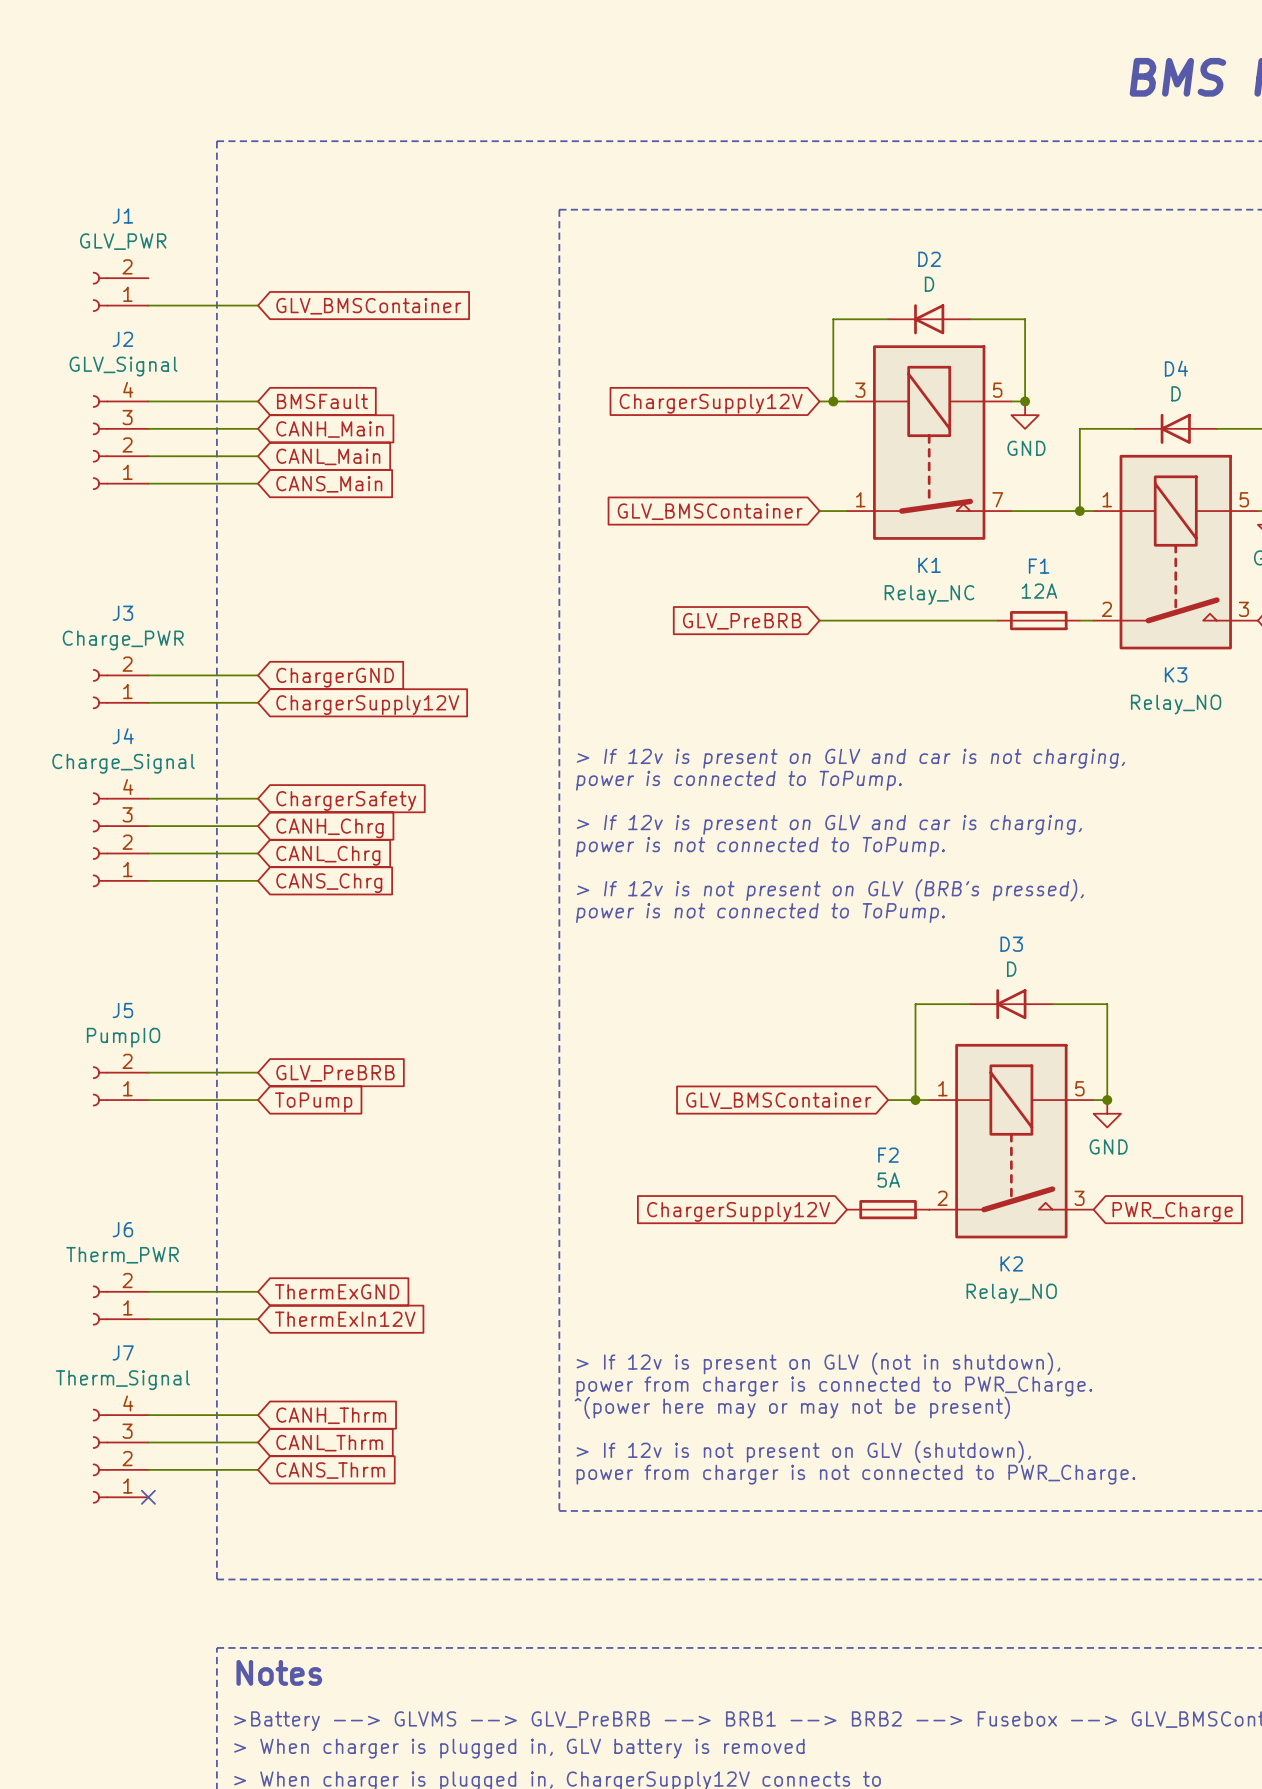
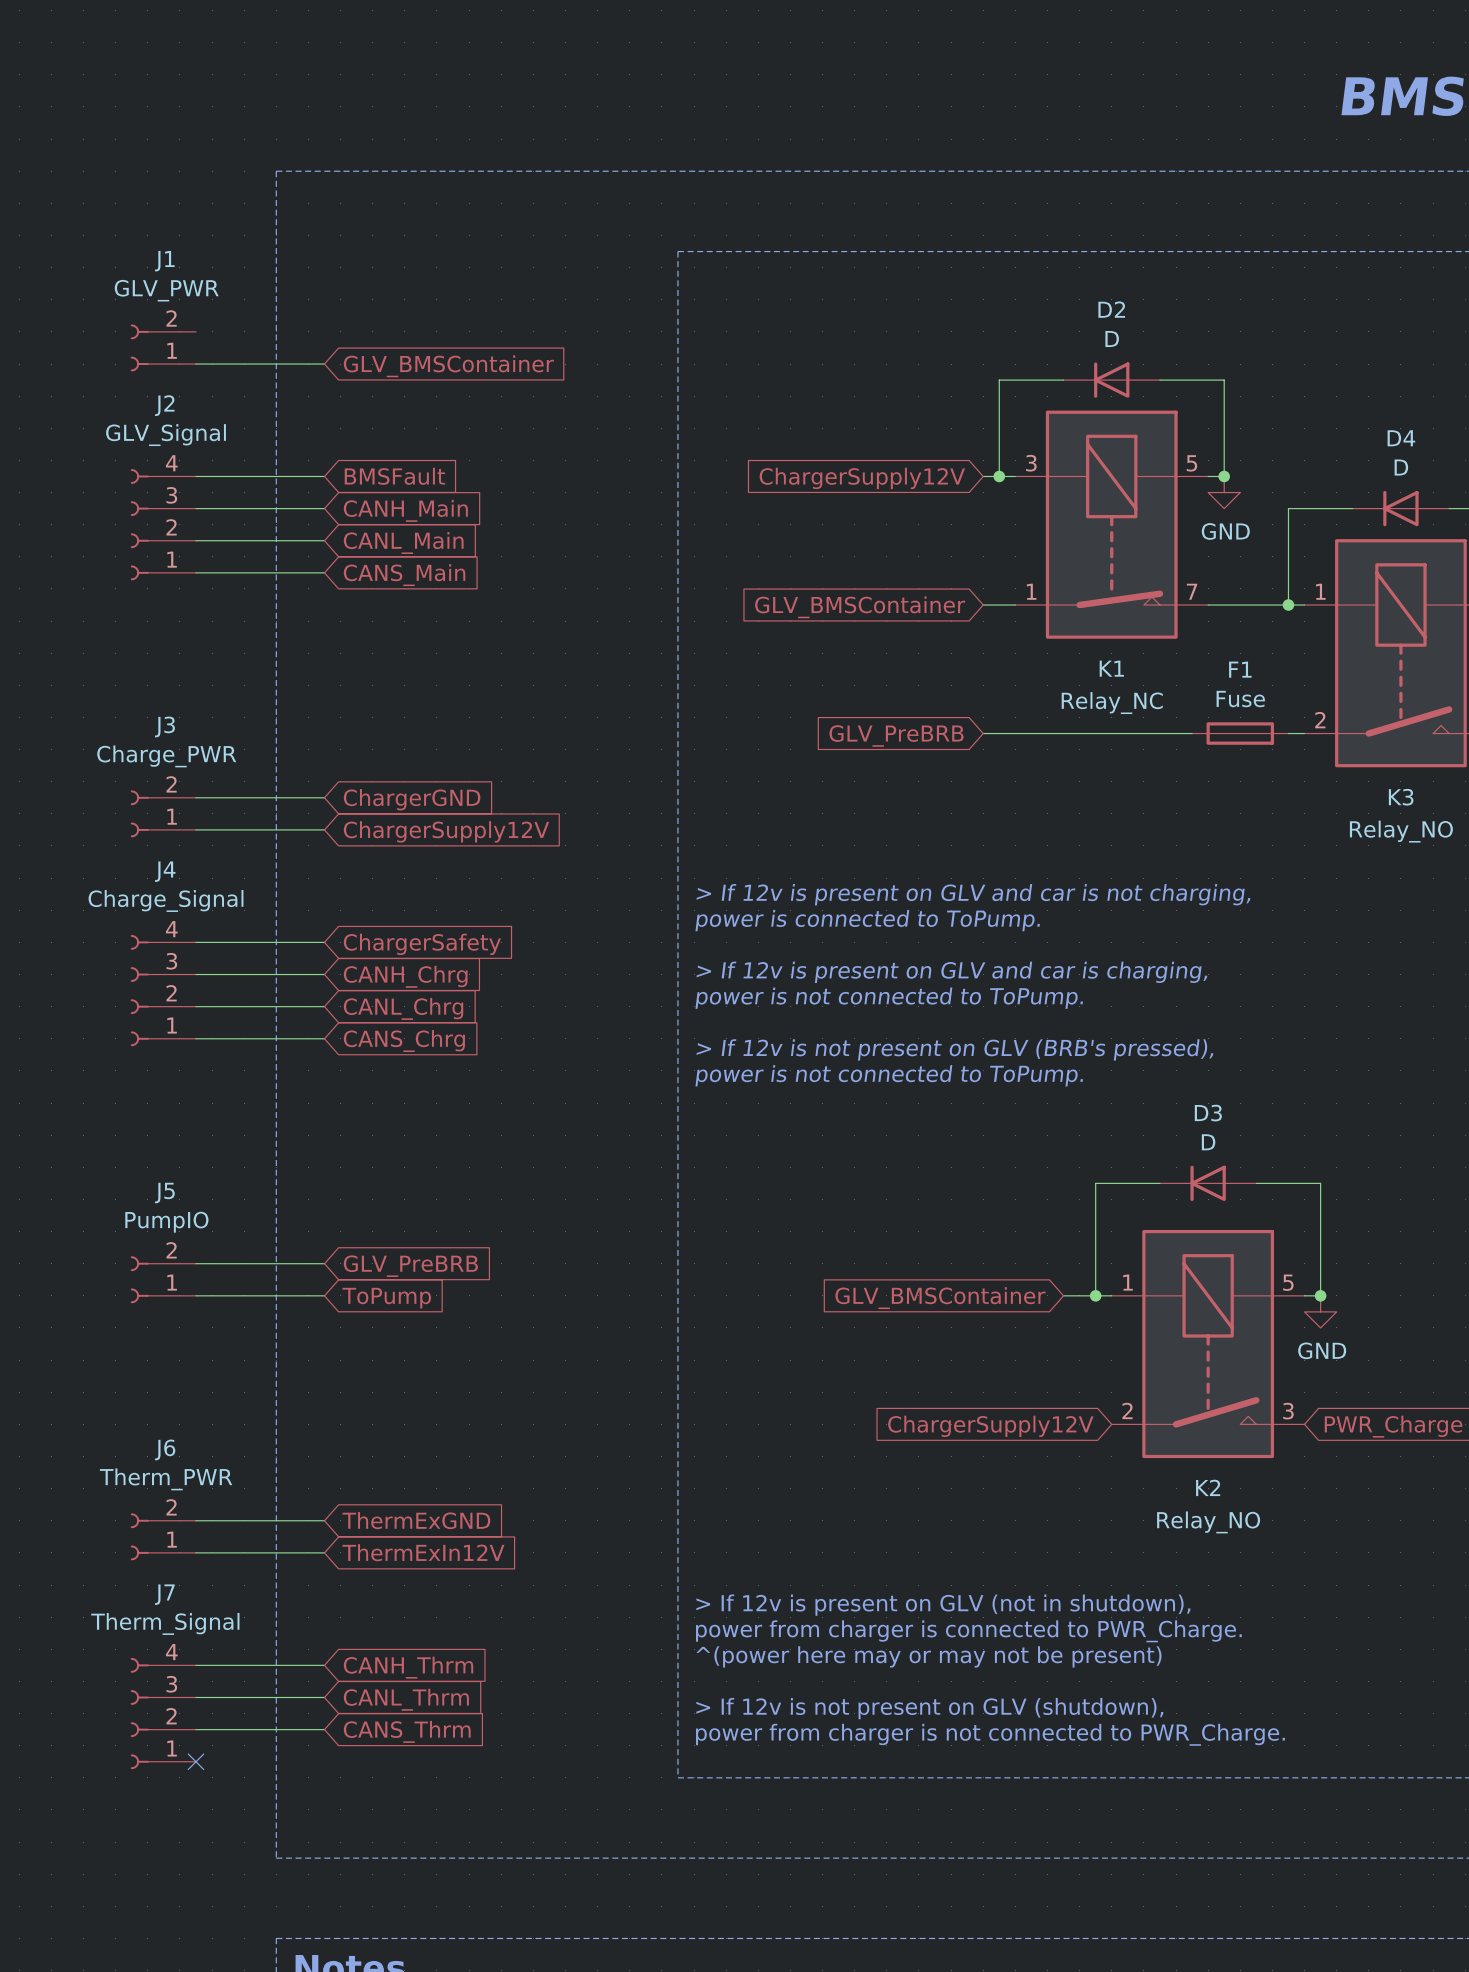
F1 value: 12A (1039, 591) -> Fuse (1240, 699)
F2: 5A (888, 1209) -> none
global label position: ChargerSupply12V (738, 1211) -> ChargerSupply12V (990, 1426)

